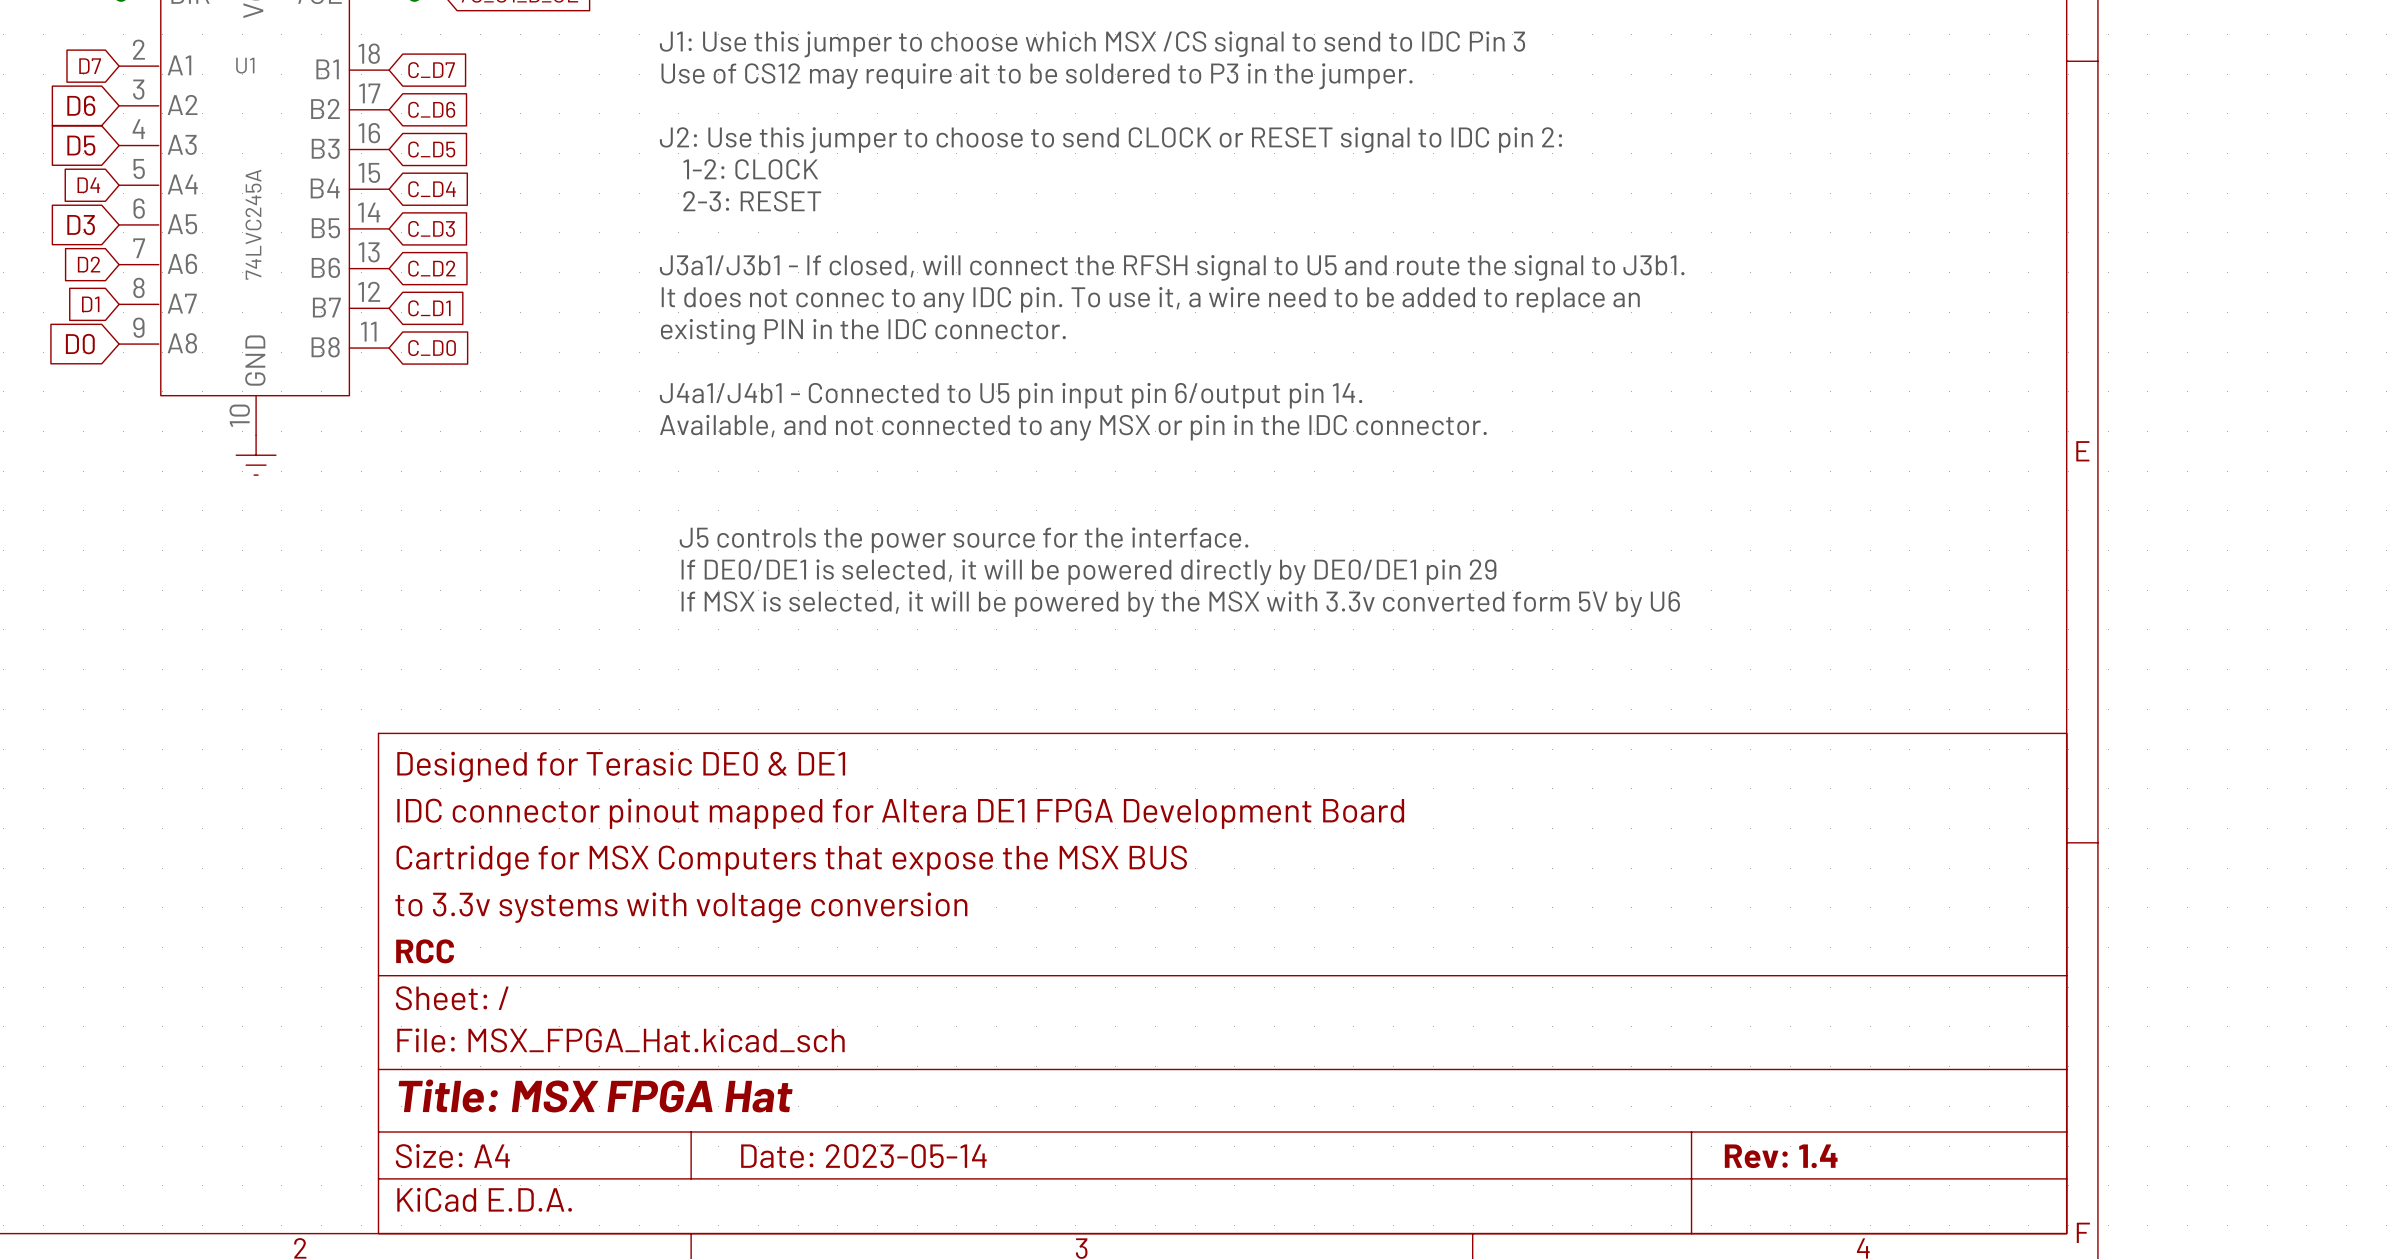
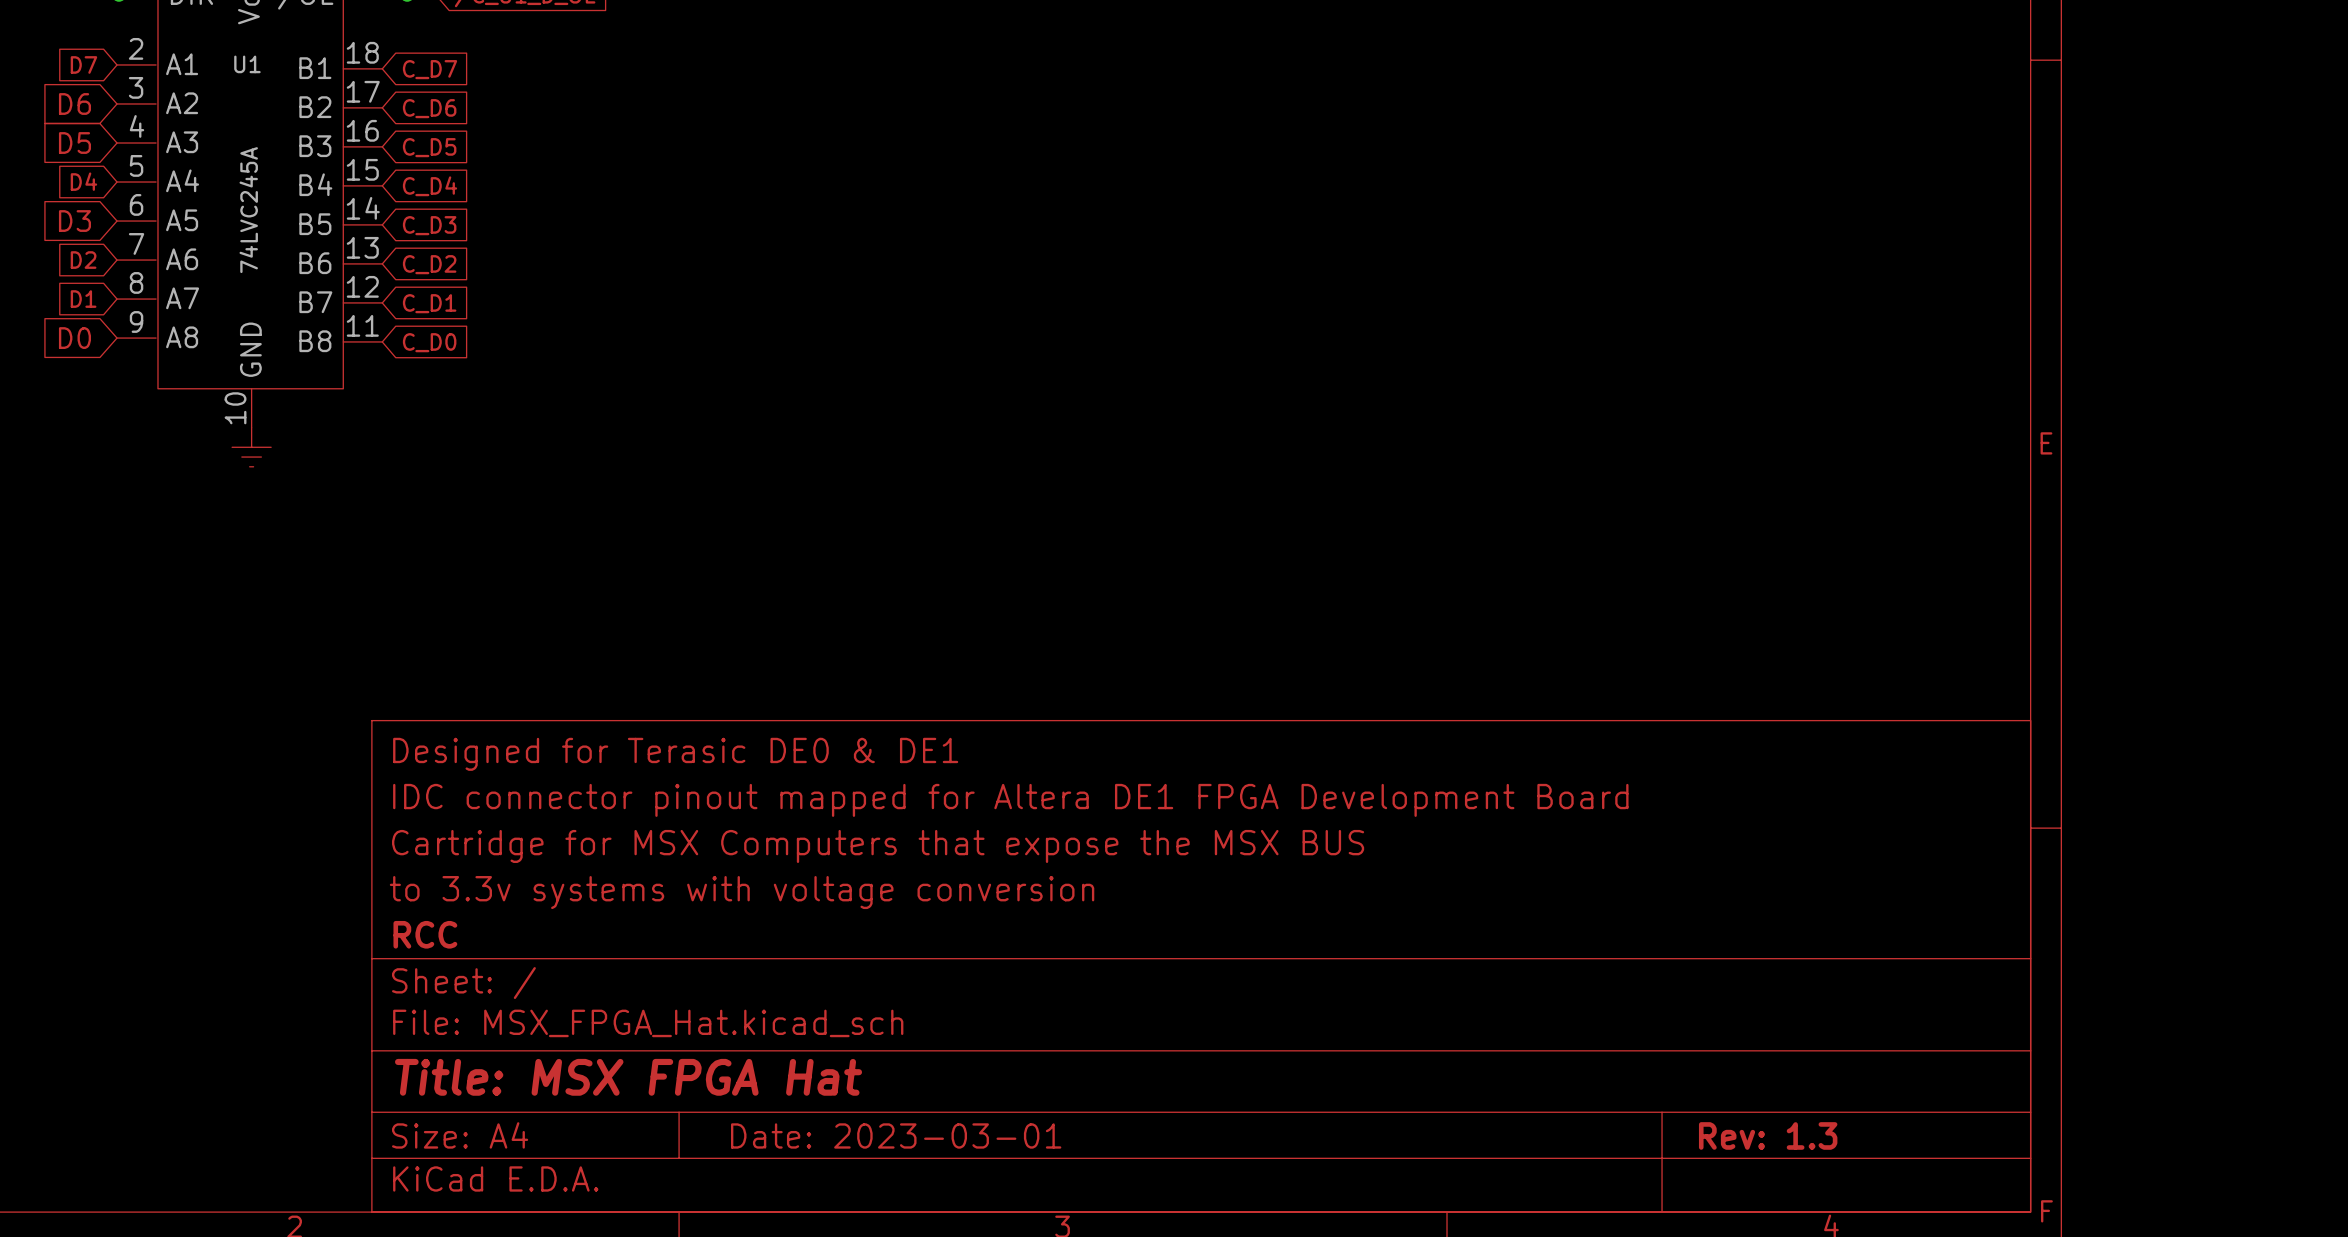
text: J1: Use this jumper to choose which MSX /CS signal to send to IDC Pin 3 (1092, 44) -> none
text: Use of CS12 may require ait to be soldered to P3 in the jumper. (1037, 76) -> none
text: J2: Use this jumper to choose to send CLOCK or RESET signal to IDC pin 2: (1110, 140) -> none
text: 1-2: CLOCK (750, 169) -> none
text: 2-3: RESET (752, 201) -> none
text: J3a1/J3b1 - If closed, will connect the RFSH signal to U5 and route the signal to J3b1. (1172, 267) -> none
text: It does not connec to any IDC pin. To use it, a wire need to be added to replace an (1150, 299) -> none
text: existing PIN in the IDC connector. (863, 331) -> none
text: J4a1/J4b1 - Connected to U5 pin input pin 6/output pin 14. (1011, 395) -> none
text: Available, and not connected to any MSX or pin in the IDC connector. (1073, 427) -> none
text: J5 controls the power source for the interface. (964, 540) -> none
text: If DE0/DE1 is selected, it will be powered directly by DE0/DE1 pin 29 (1088, 572) -> none
text: If MSX is selected, it will be powered by the MSX with 3.3v converted form 5V by U6 (1180, 604) -> none
title block: Date: 2023-05-14 (863, 1156) -> Date: 2023-03-01 (896, 1135)
title block: Rev: 1.4 (1781, 1156) -> Rev: 1.3 (1768, 1135)

